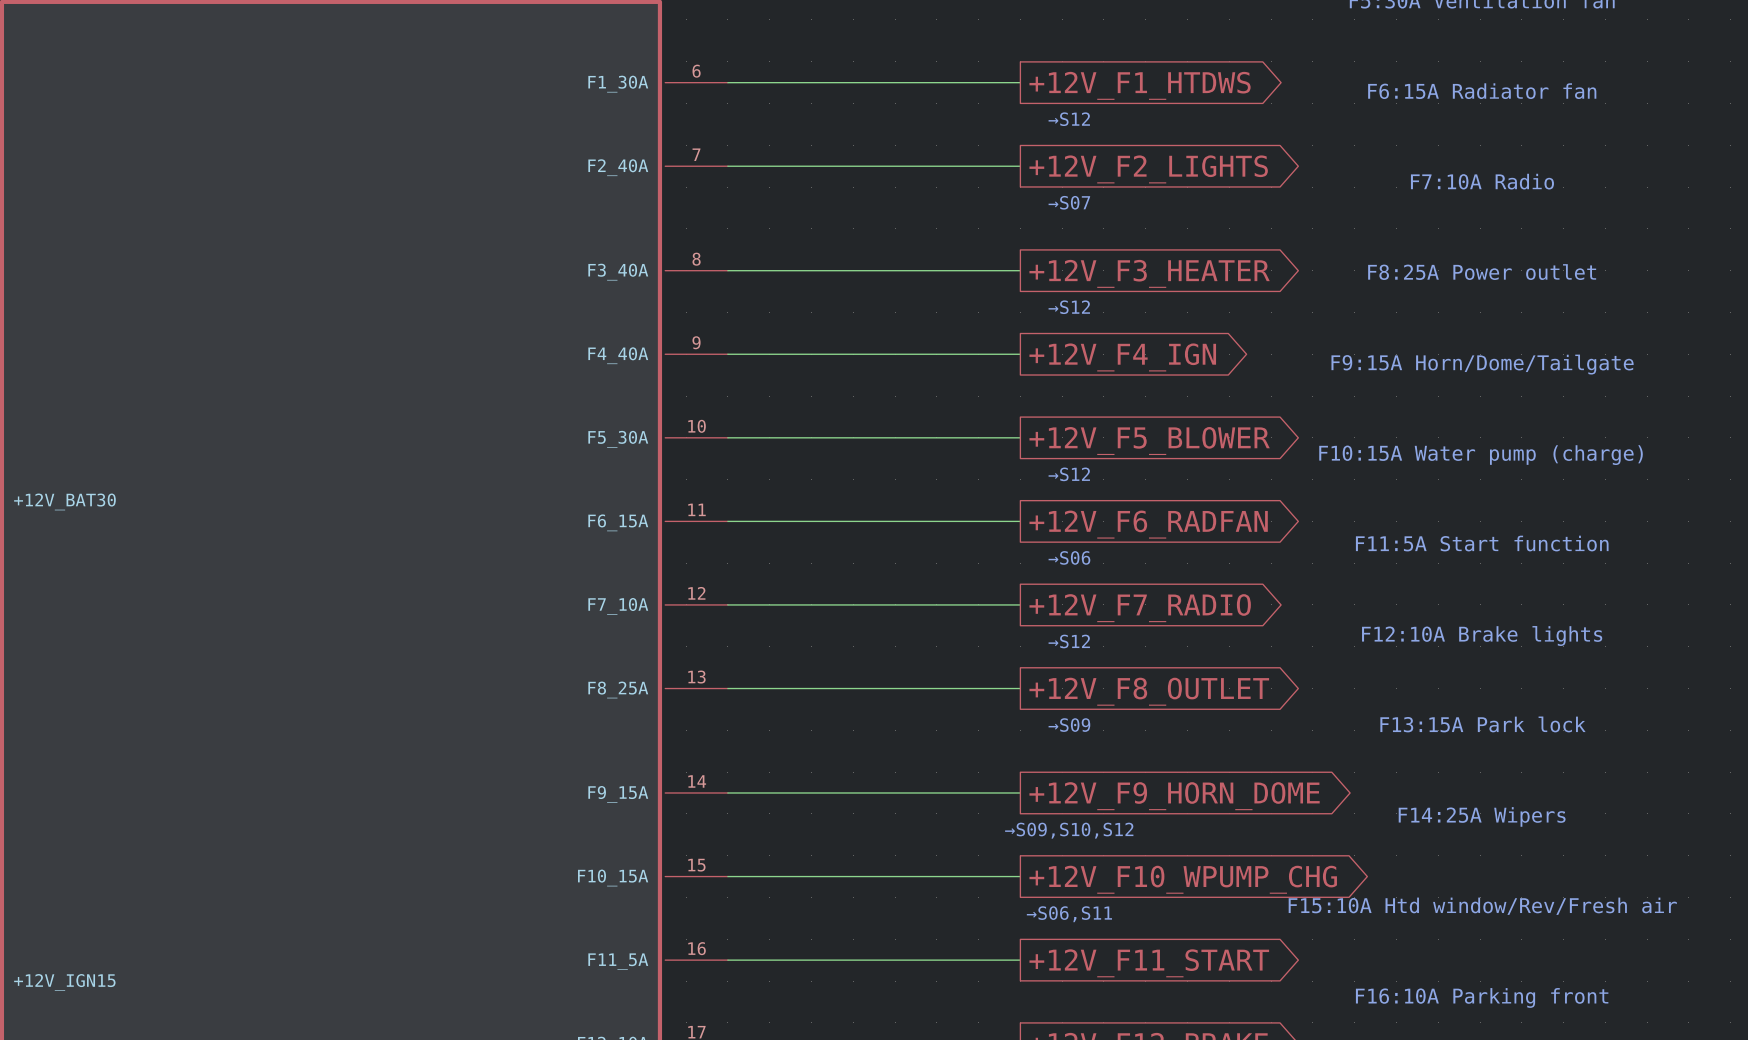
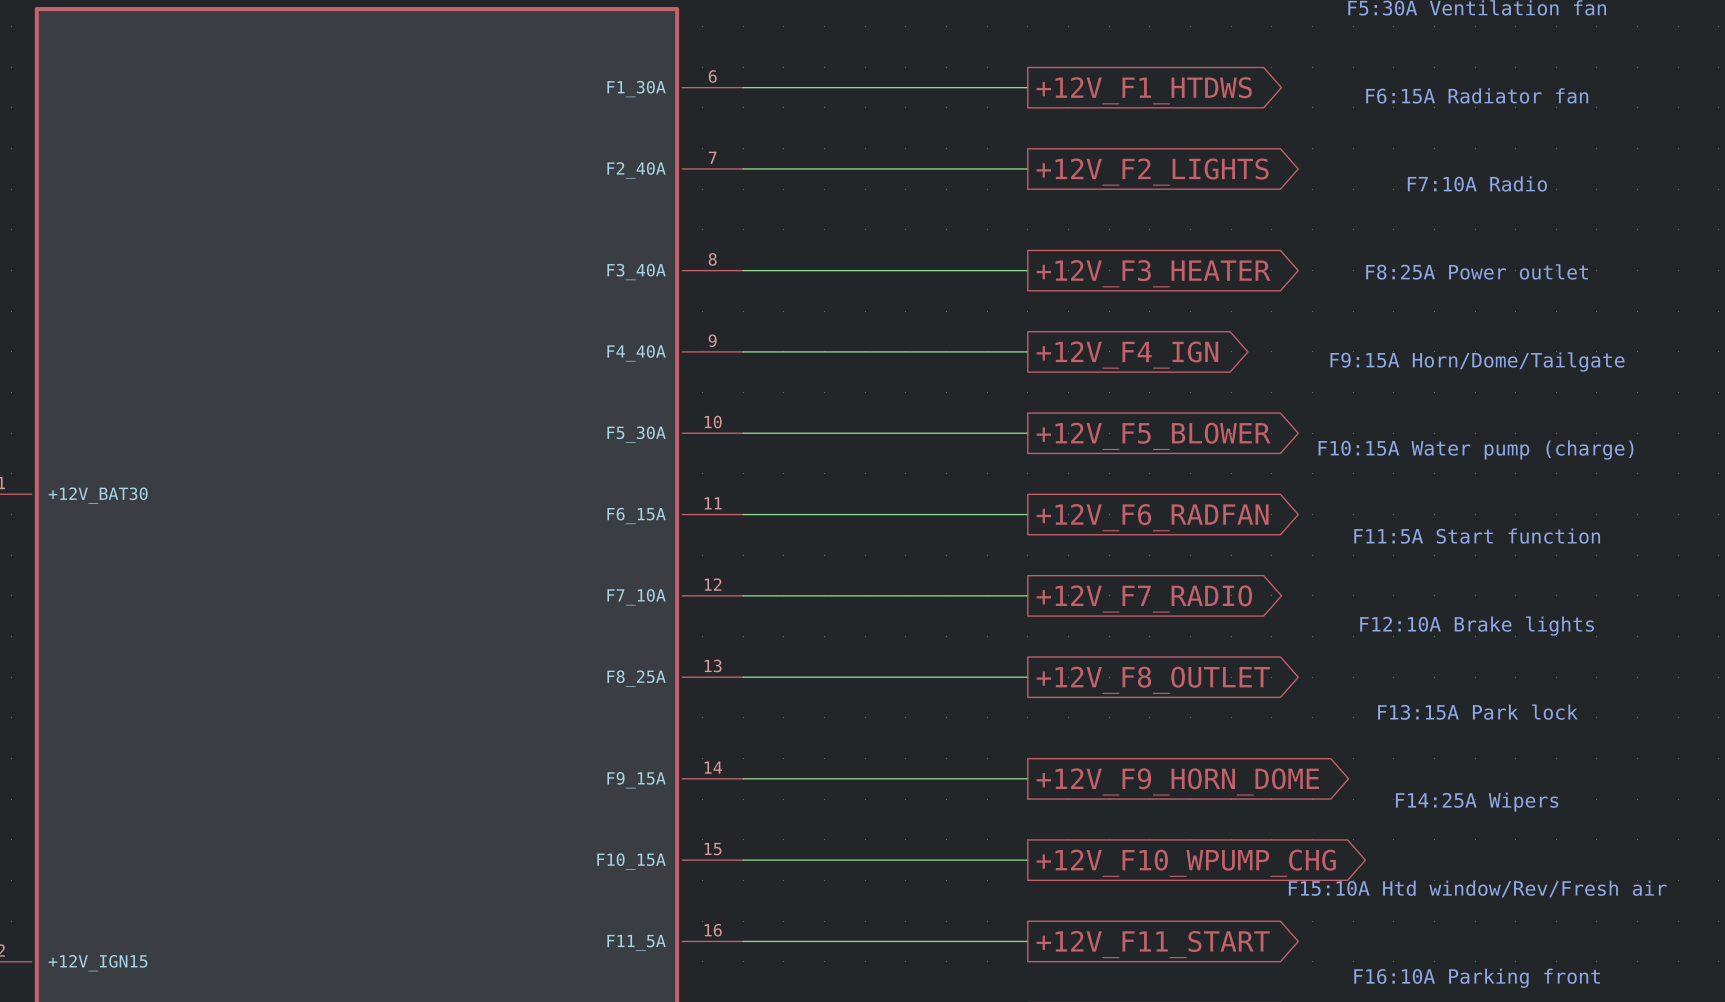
text: →S12 (1069, 119) -> none
text: →S07 (1069, 202) -> none
text: →S12 (1069, 307) -> none
text: →S12 (1069, 474) -> none
text: →S06 (1069, 557) -> none
text: →S12 (1069, 641) -> none
text: →S09 (1069, 725) -> none
text: →S09,S10,S12 (1069, 830) -> none
text: →S06,S11 (1069, 914) -> none

